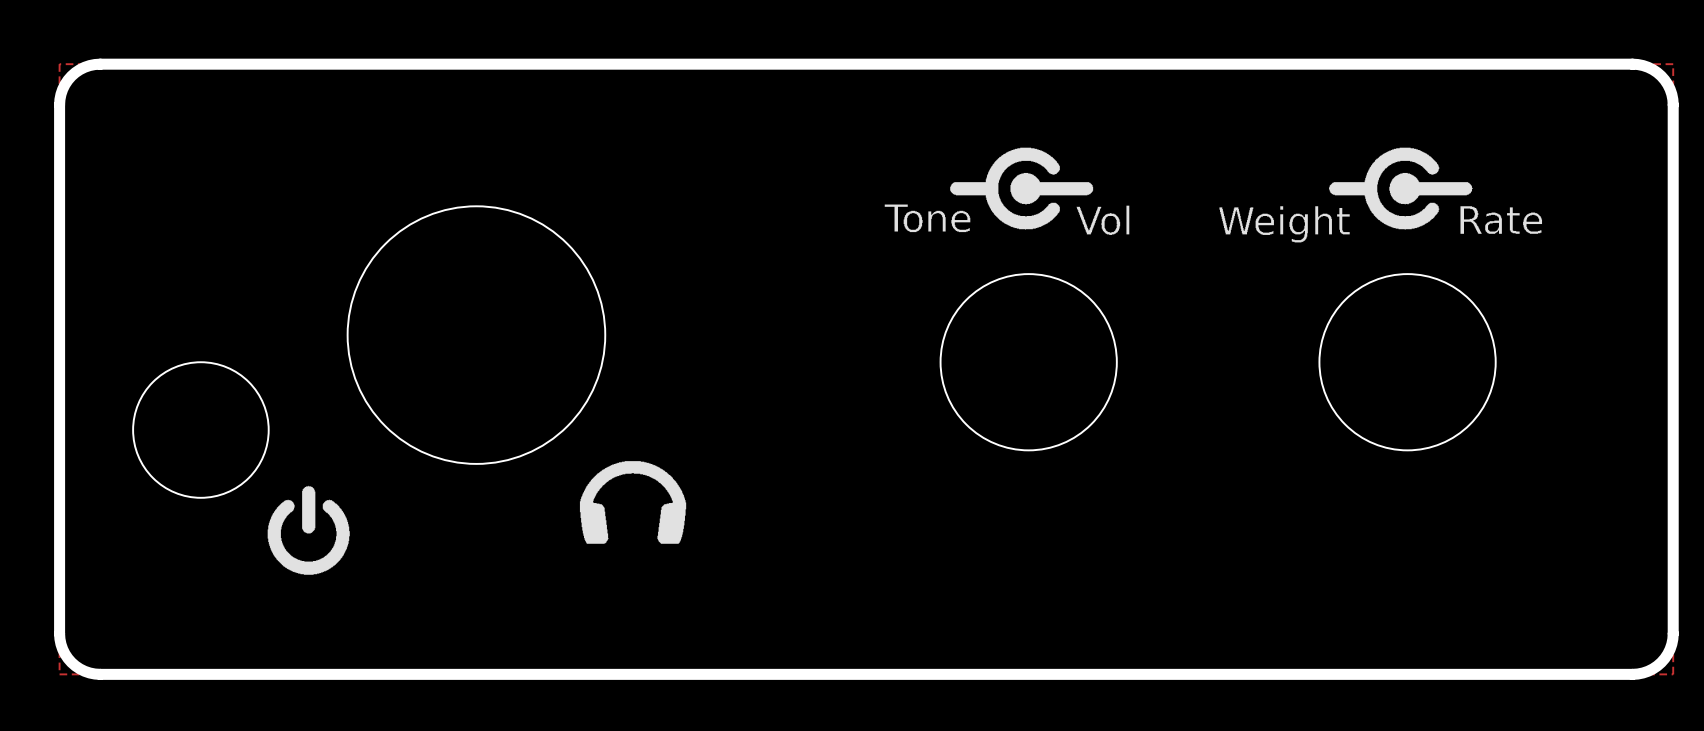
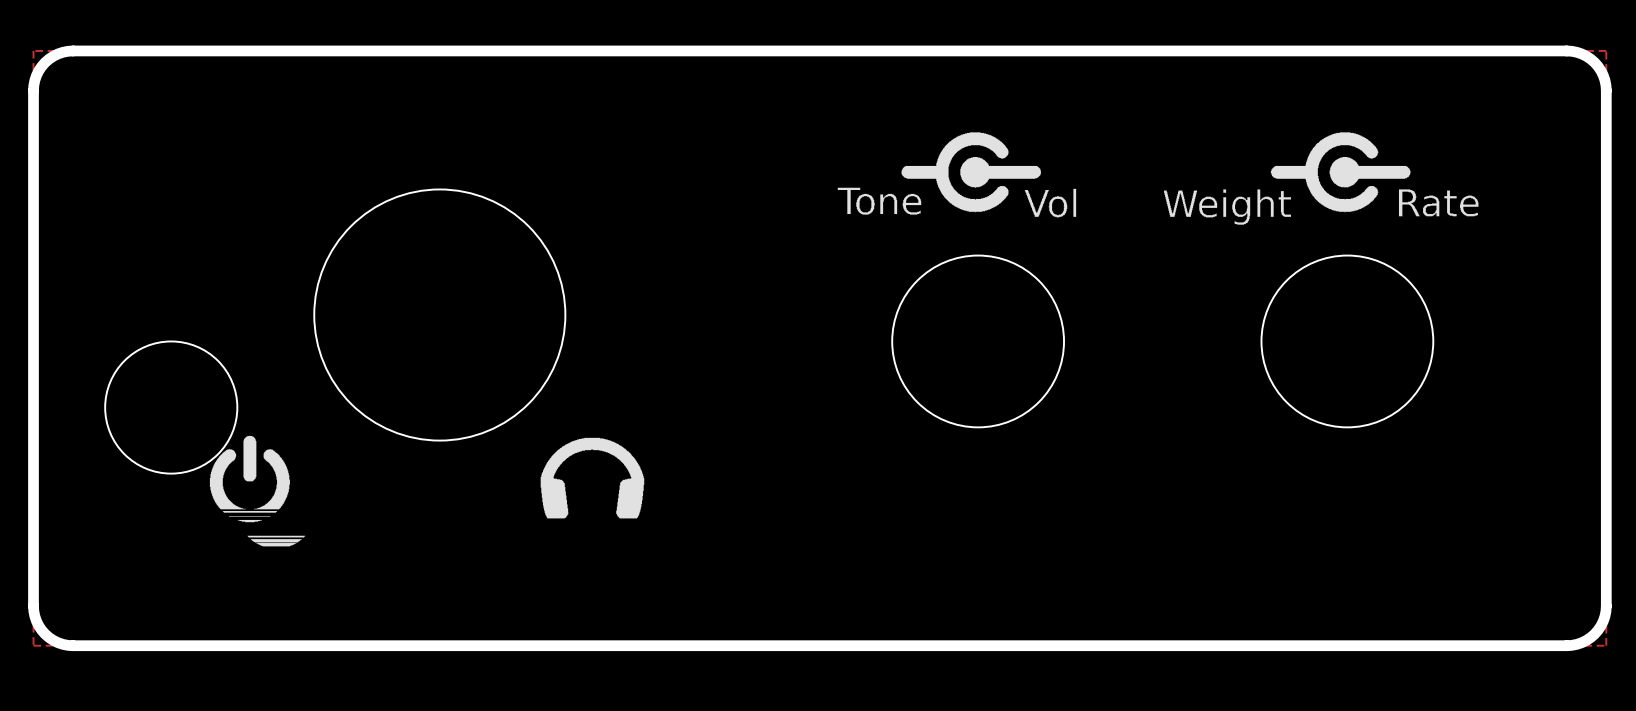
drawing: none -> [209, 435, 290, 523]
drawing position: (308, 486) -> (270, 449)
drawing position: (308, 487) -> (269, 450)
drawing: [267, 488, 350, 575] -> none
drawing position: (308, 488) -> (270, 451)
drawing position: (308, 563) -> (249, 511)
drawing position: (308, 564) -> (249, 512)
drawing position: (308, 568) -> (249, 516)
drawing position: (308, 572) -> (249, 520)

